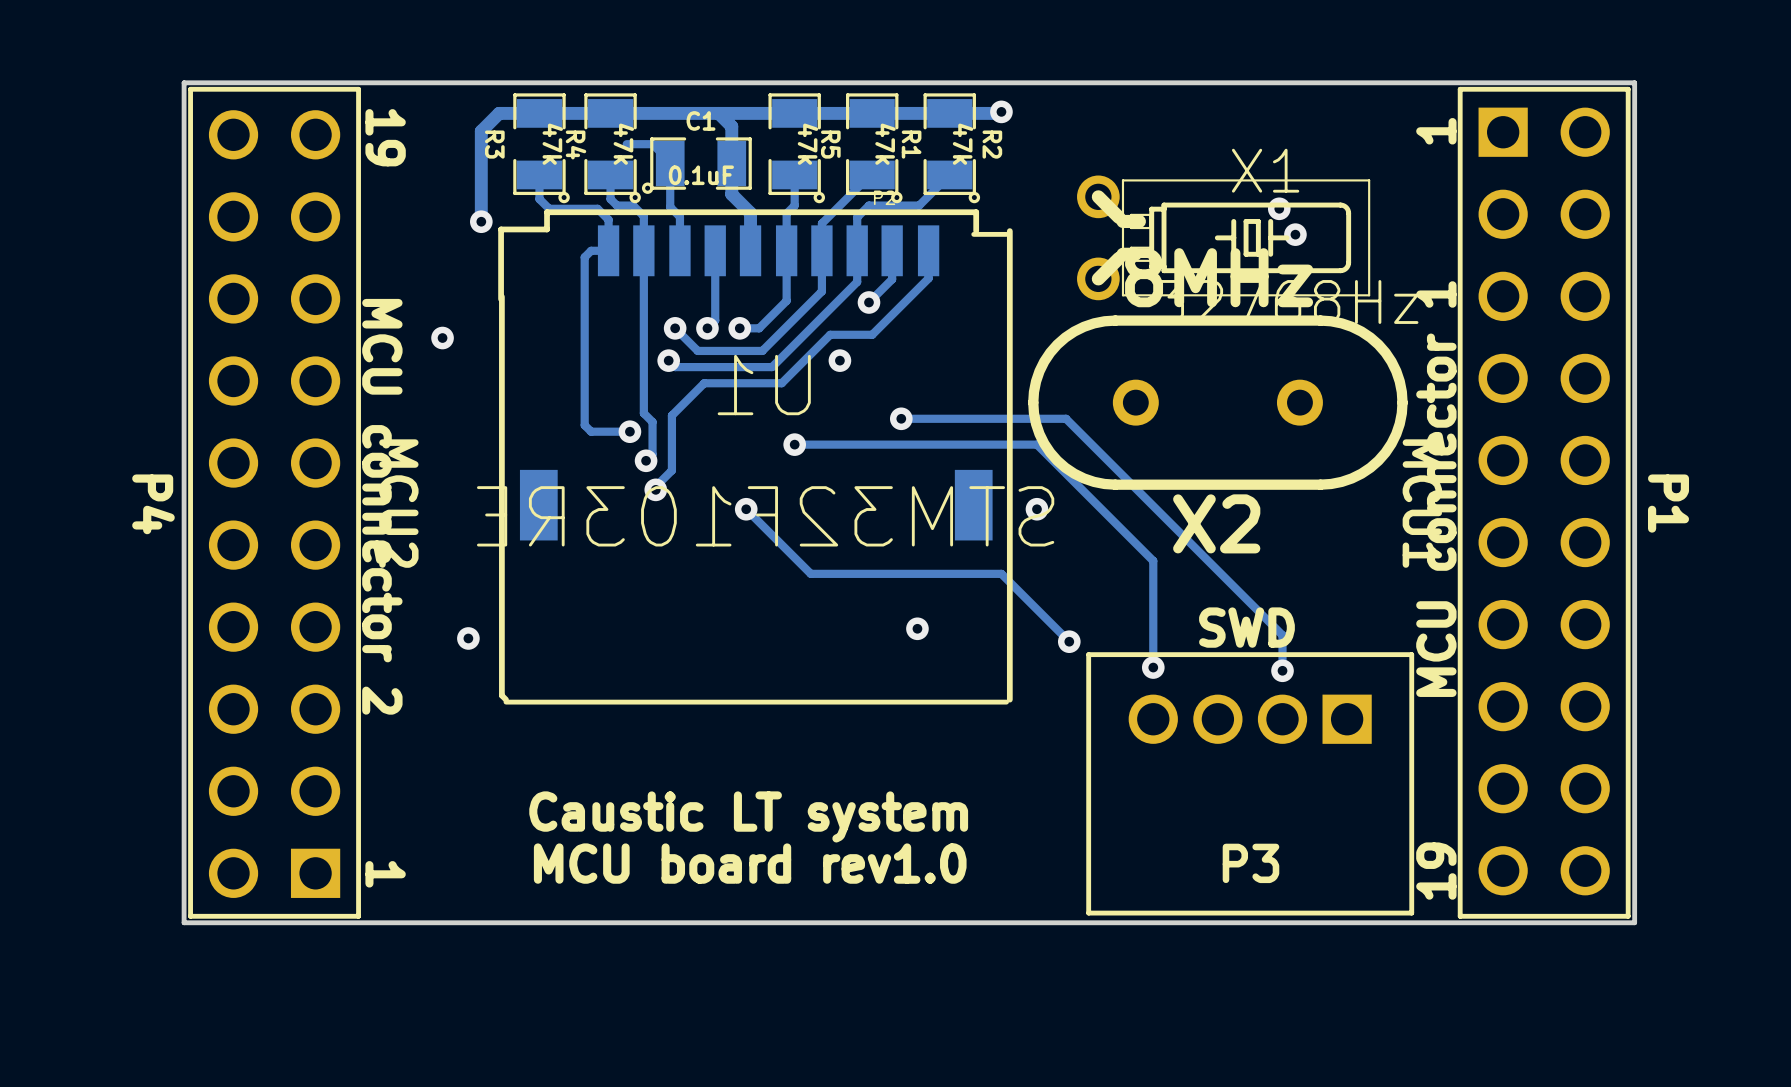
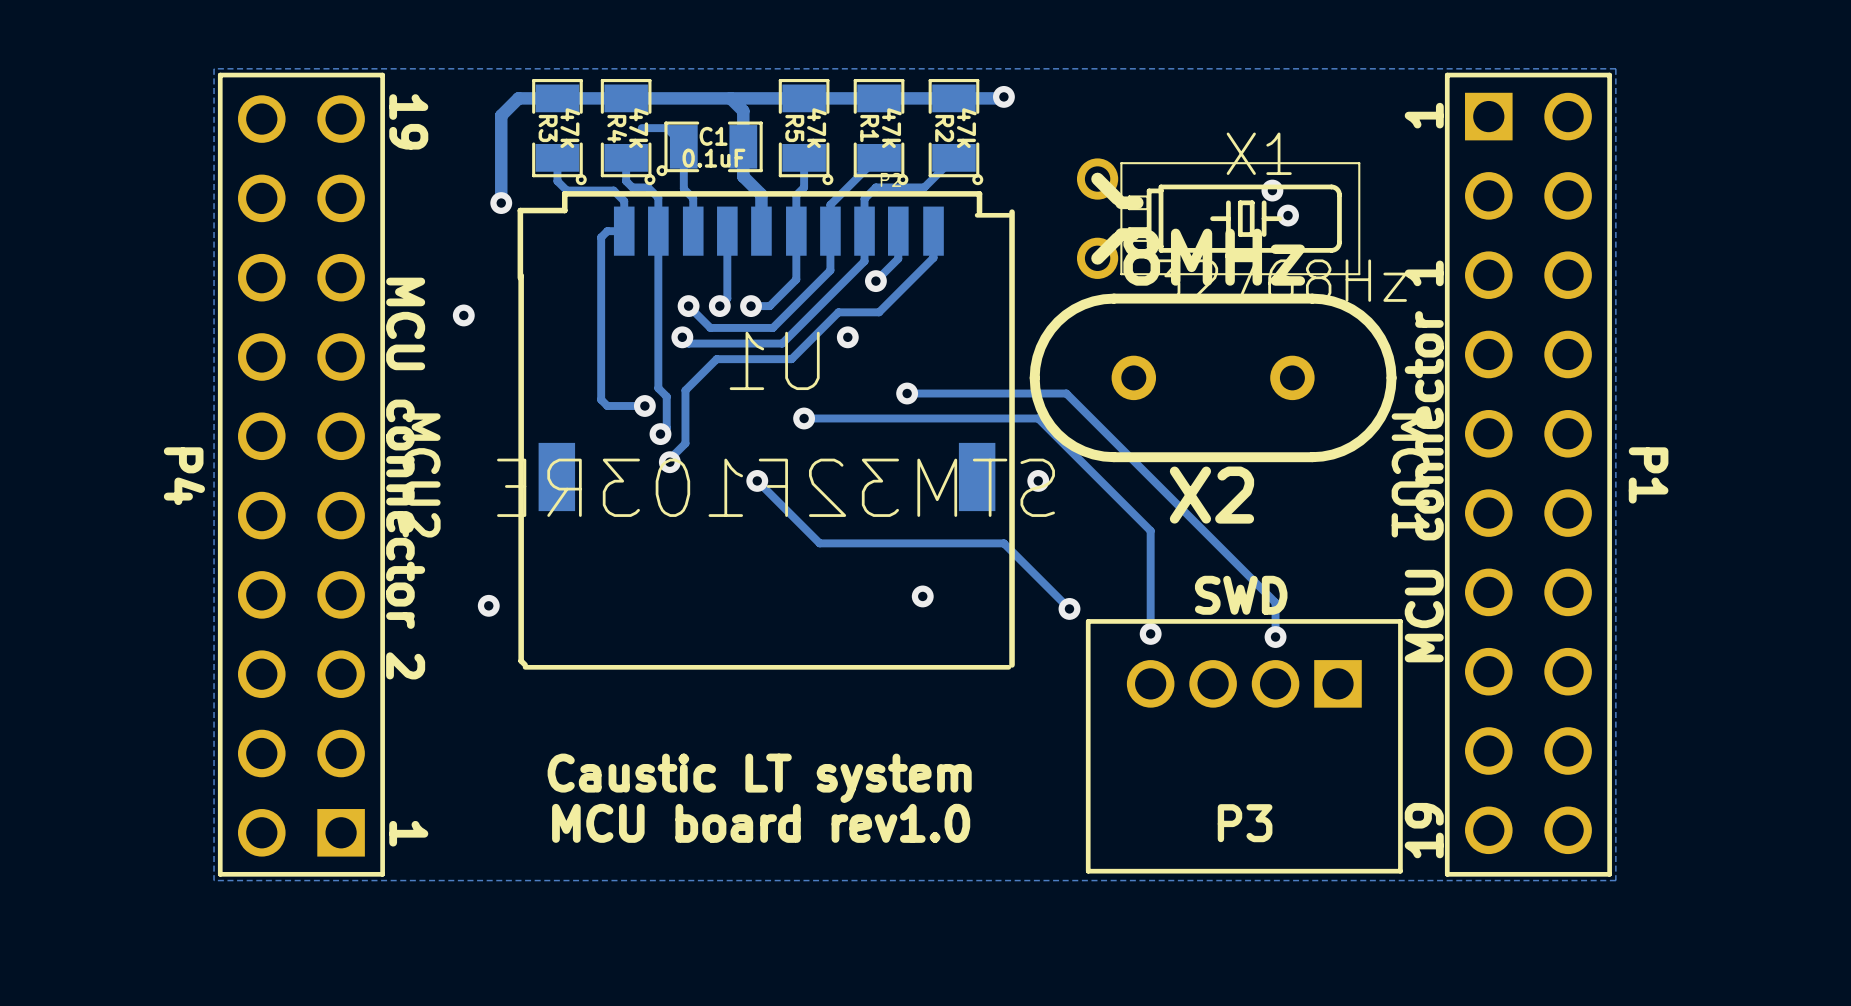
board edge: (1634, 82) (1634, 922) (184, 922) (184, 82) (1634, 82) -> none
C1 name position: C1 (700, 120) -> C1 (713, 136)
R3 name position: R3 (494, 144) -> R3 (548, 128)
R4 name position: R4 (575, 144) -> R4 (617, 128)
R5 name position: R5 (830, 144) -> R5 (794, 128)
R1 name position: R1 (911, 144) -> R1 (869, 128)
R2 name position: R2 (992, 144) -> R2 (944, 128)

